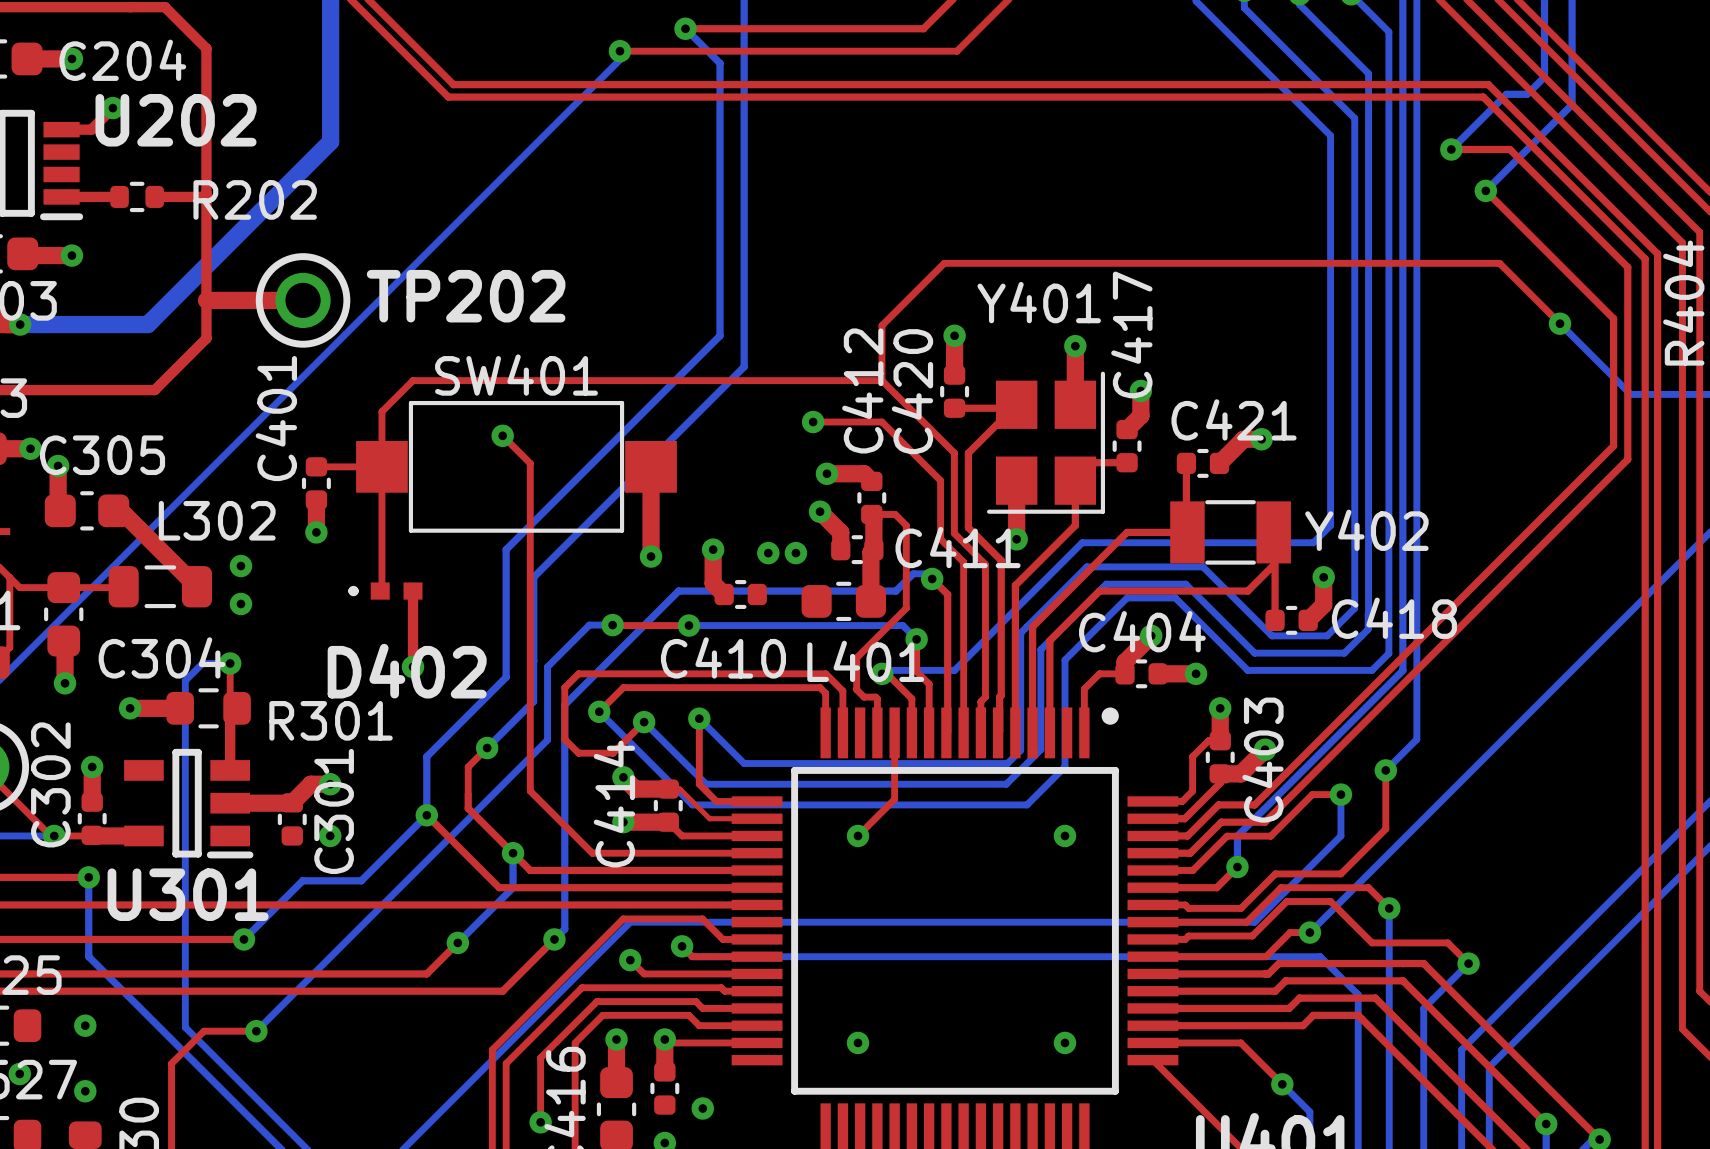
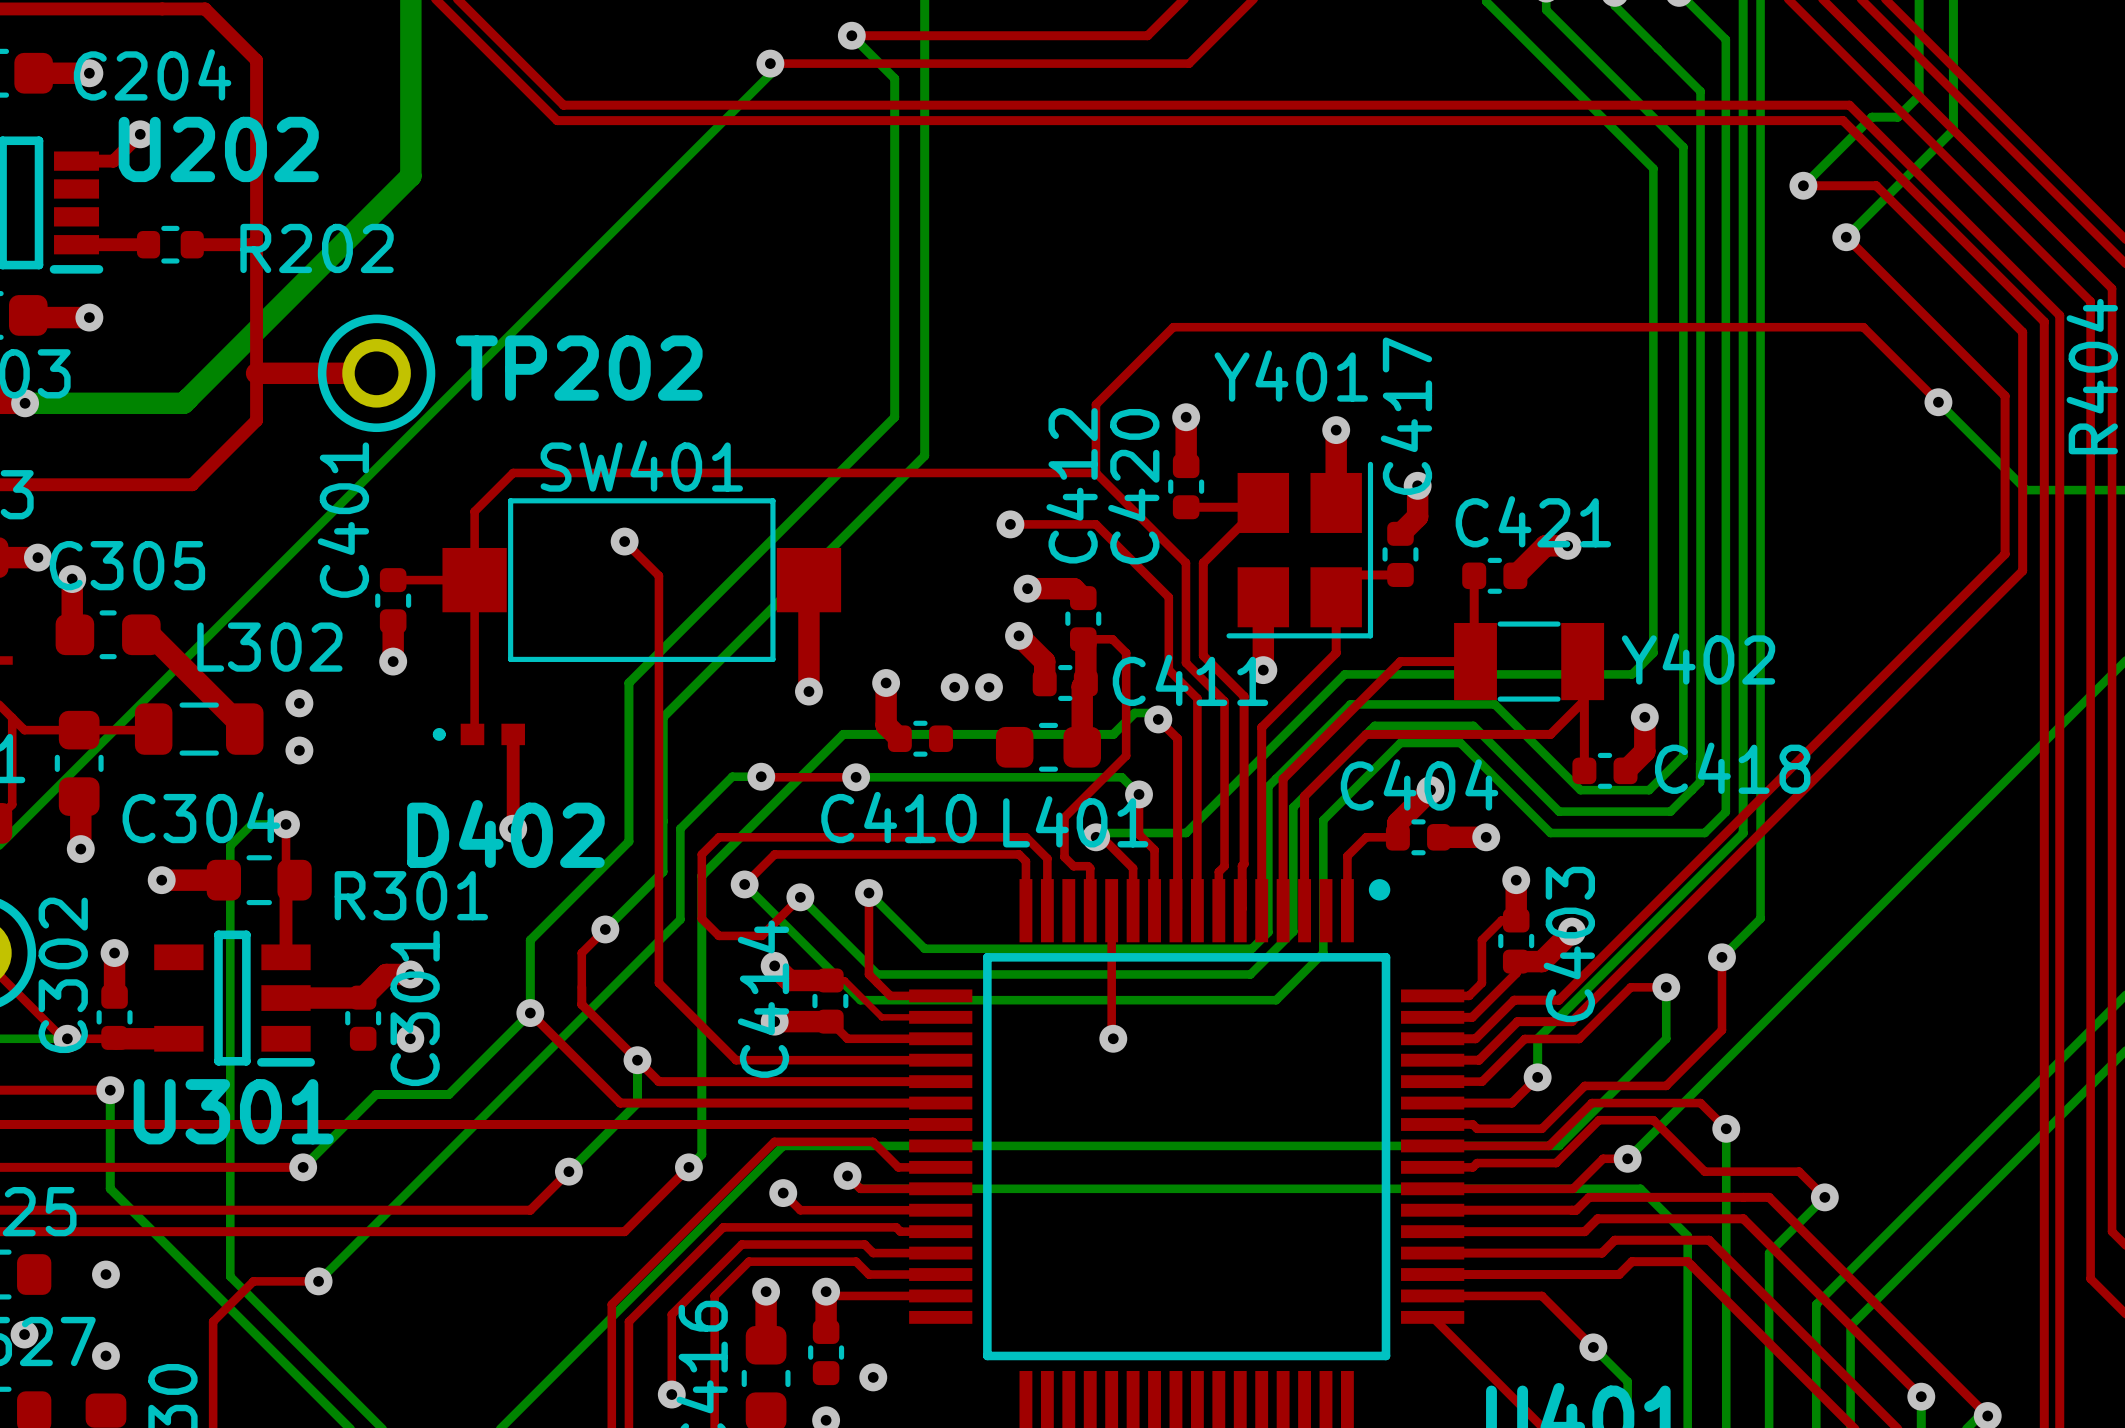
top track: (894, 799) (858, 835) -> (1111, 993) (1111, 1037) (1113, 1038)
via position: (858, 835) -> (1113, 1038)
via: (1064, 835) -> none
via: (858, 1042) -> none
via: (1064, 1042) -> none

